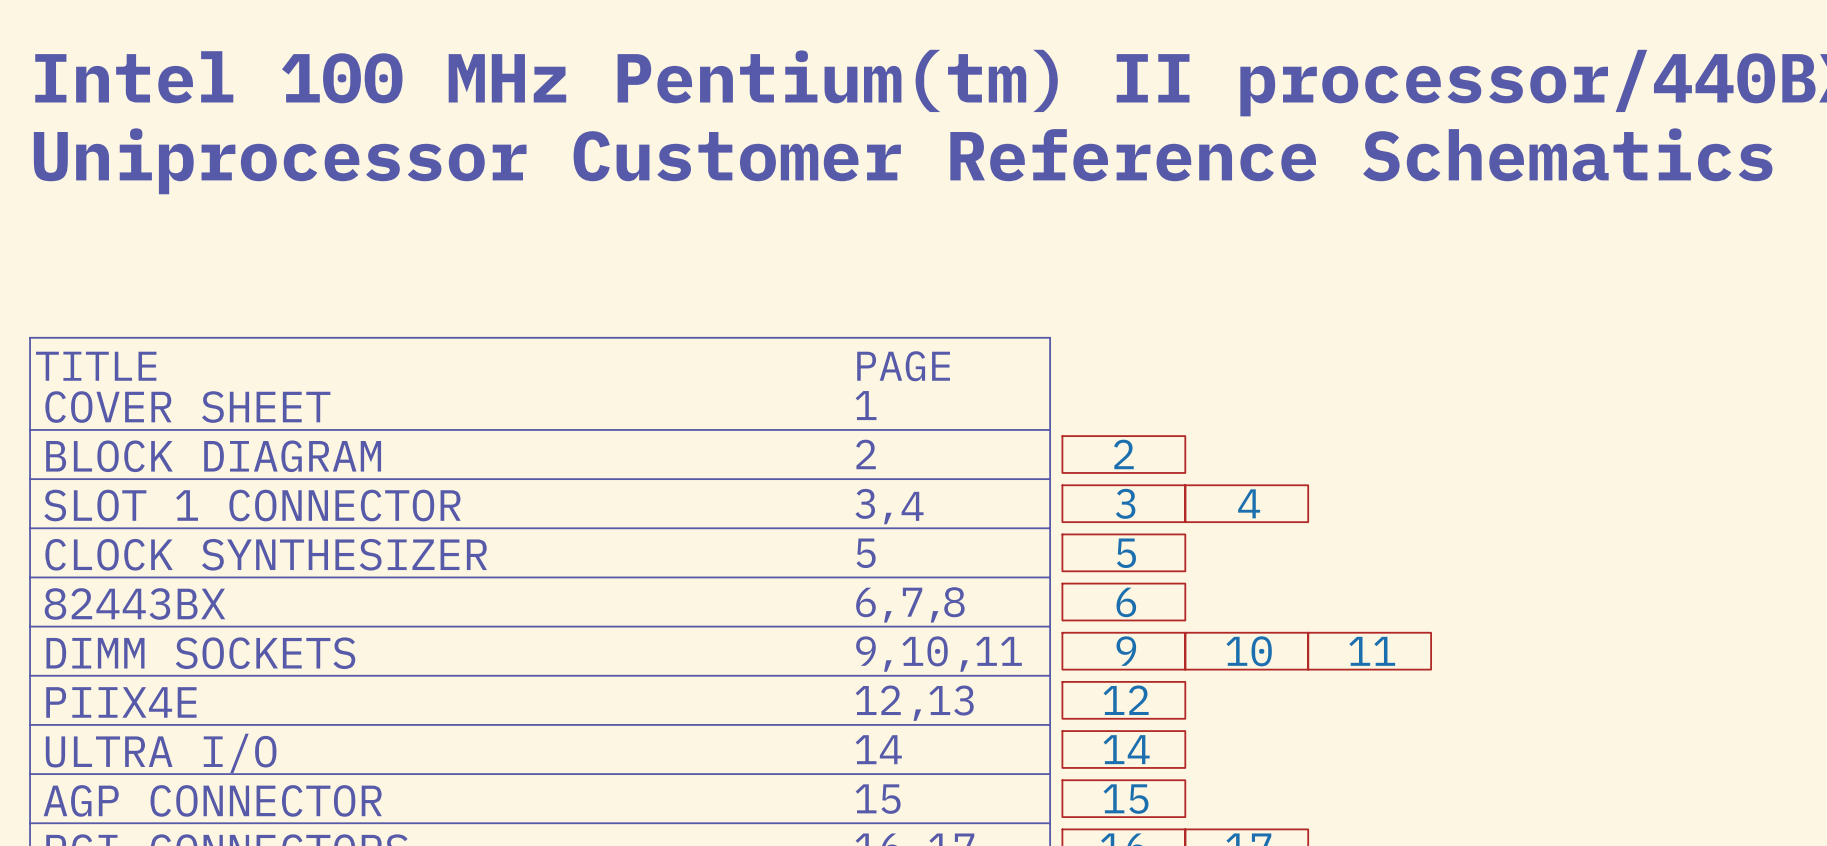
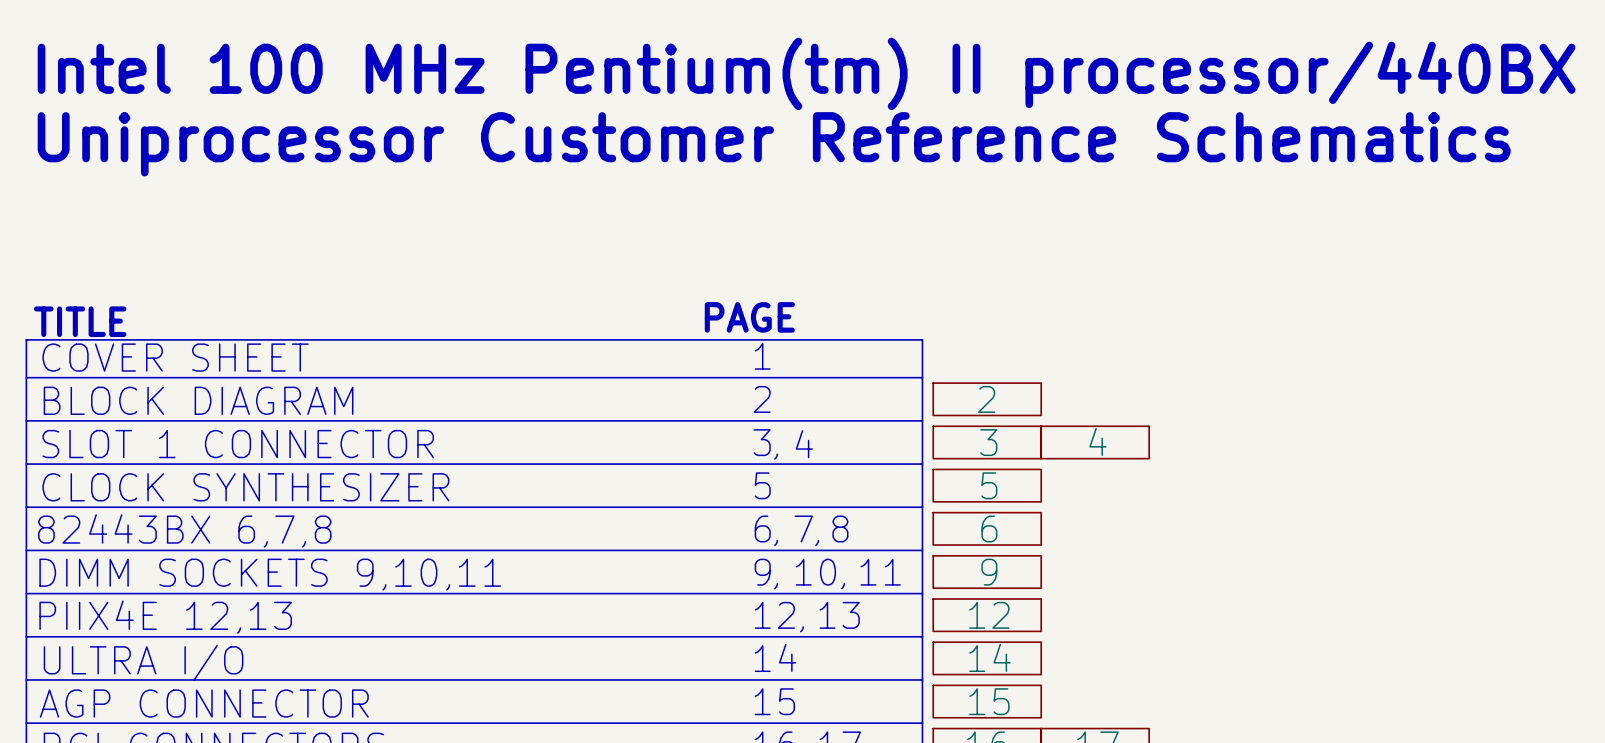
text position: PAGE (903, 366) -> PAGE (749, 317)
line: (30, 386) (30, 337) (1050, 337) (1050, 386) -> (26, 339) (922, 339)
text: 82443BX (134, 603) -> 82443BX 6,7,8 (184, 530)
sheet: (1246, 651) -> none
sheet: (1369, 651) -> none
text: DIMM SOCKETS (200, 653) -> DIMM SOCKETS 9,10,11 (270, 574)
text: PIIX4E (121, 702) -> PIIX4E 12,13 (165, 617)

